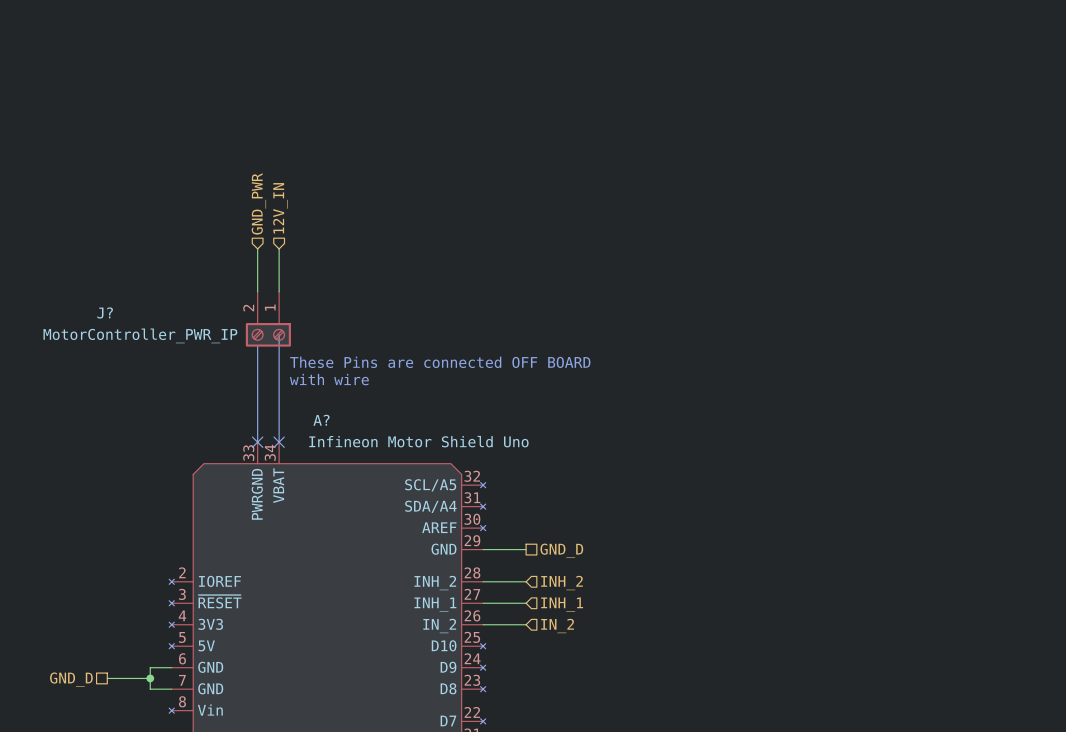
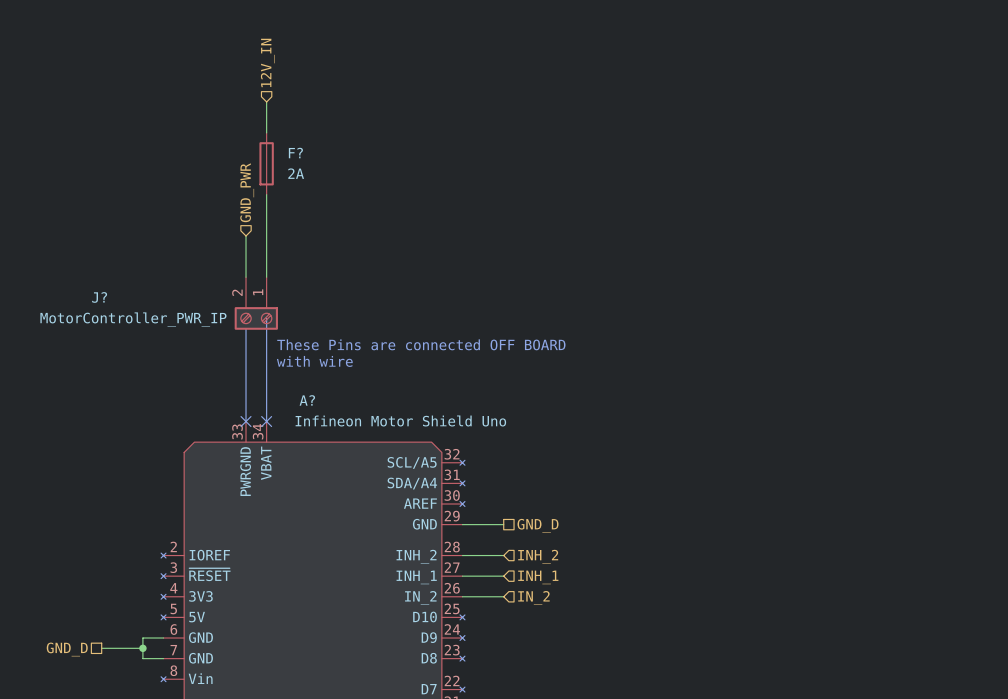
wire: none -> (266, 101) (266, 132)
F?: none -> 2A (266, 163)
wire: none -> (266, 194) (266, 235)
hierarchical label position: 12V_IN (280, 208) -> 12V_IN (267, 62)

